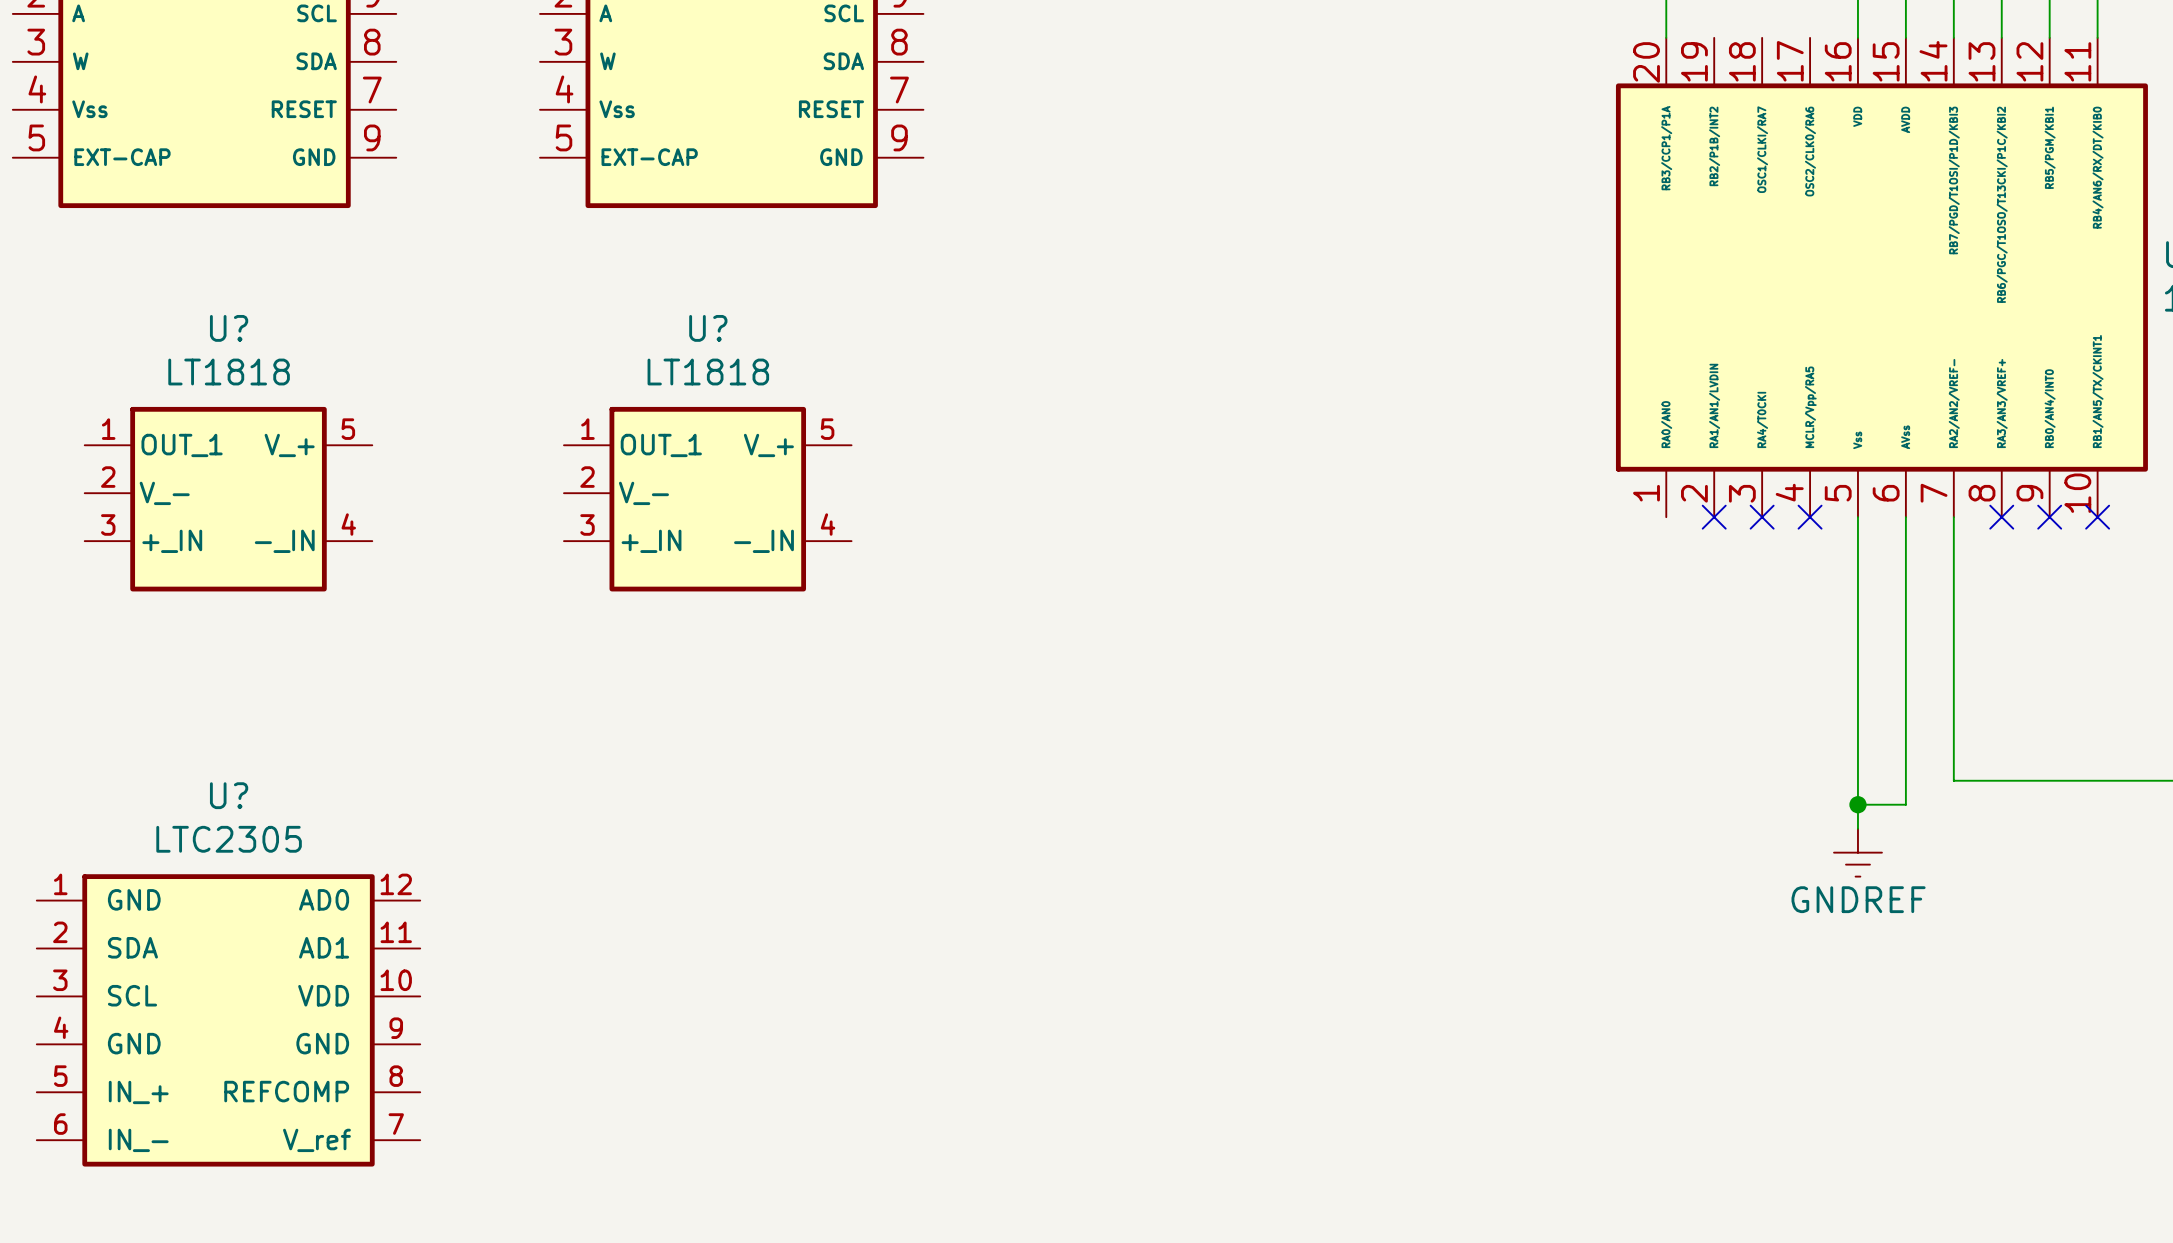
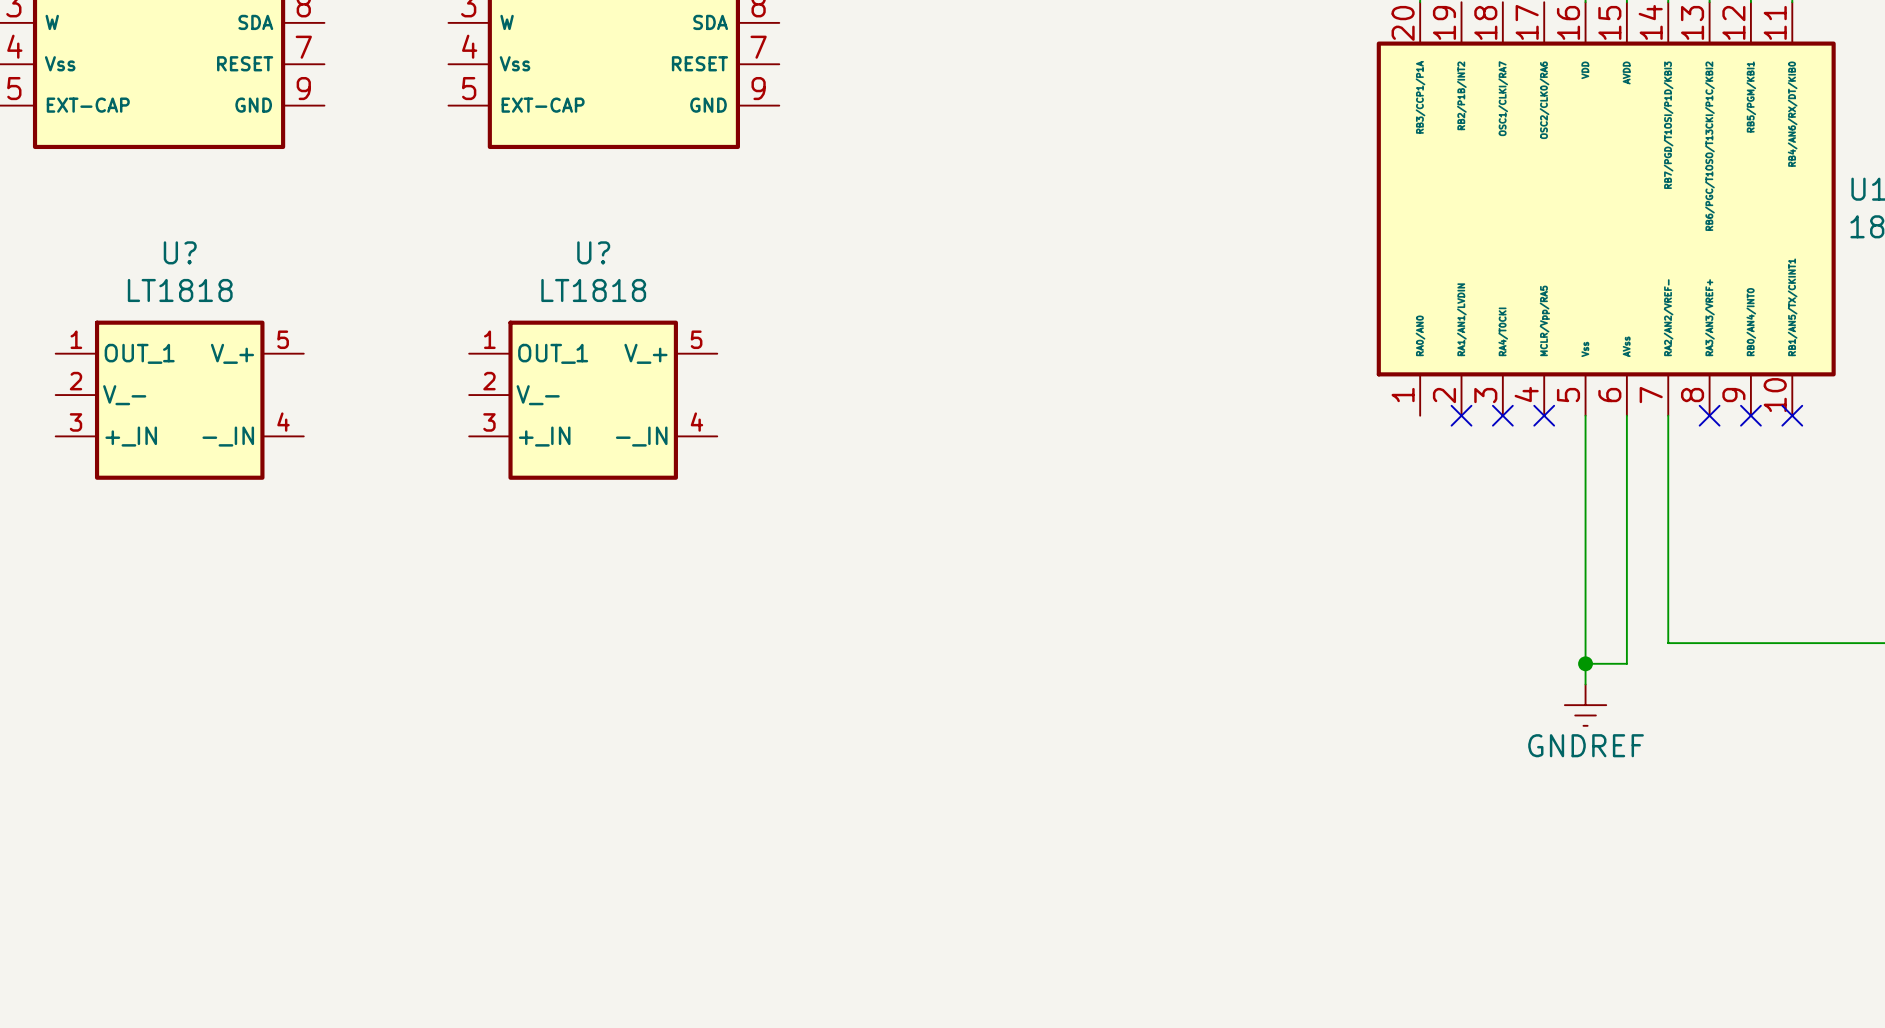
U?: LTC2305 (228, 1020) -> none

